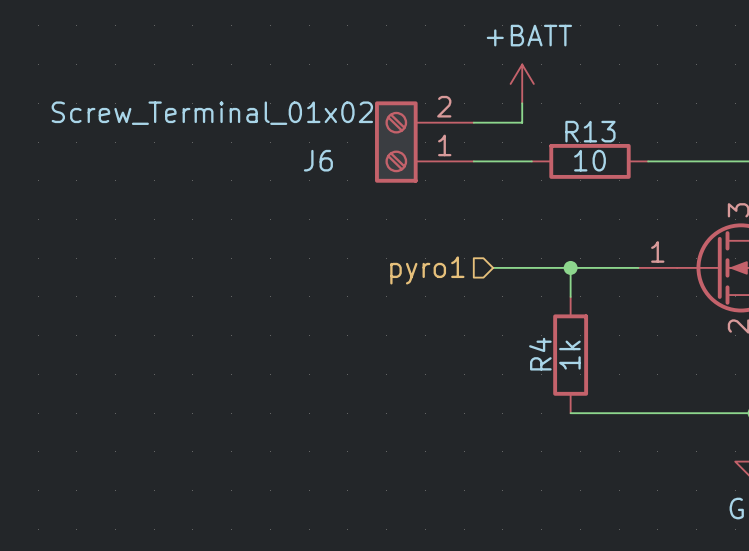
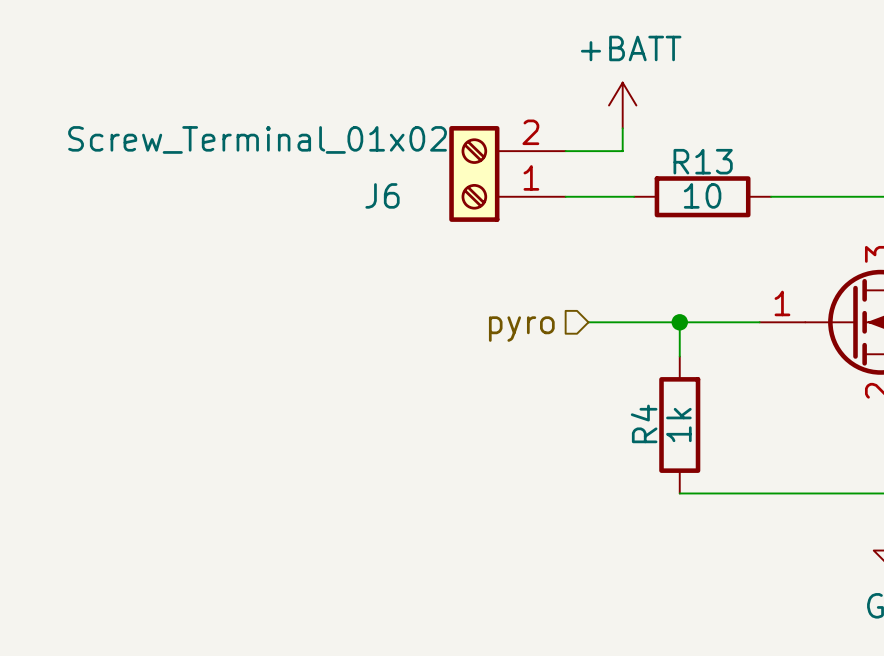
hierarchical label: pyro1 (427, 270) -> pyro (521, 329)

